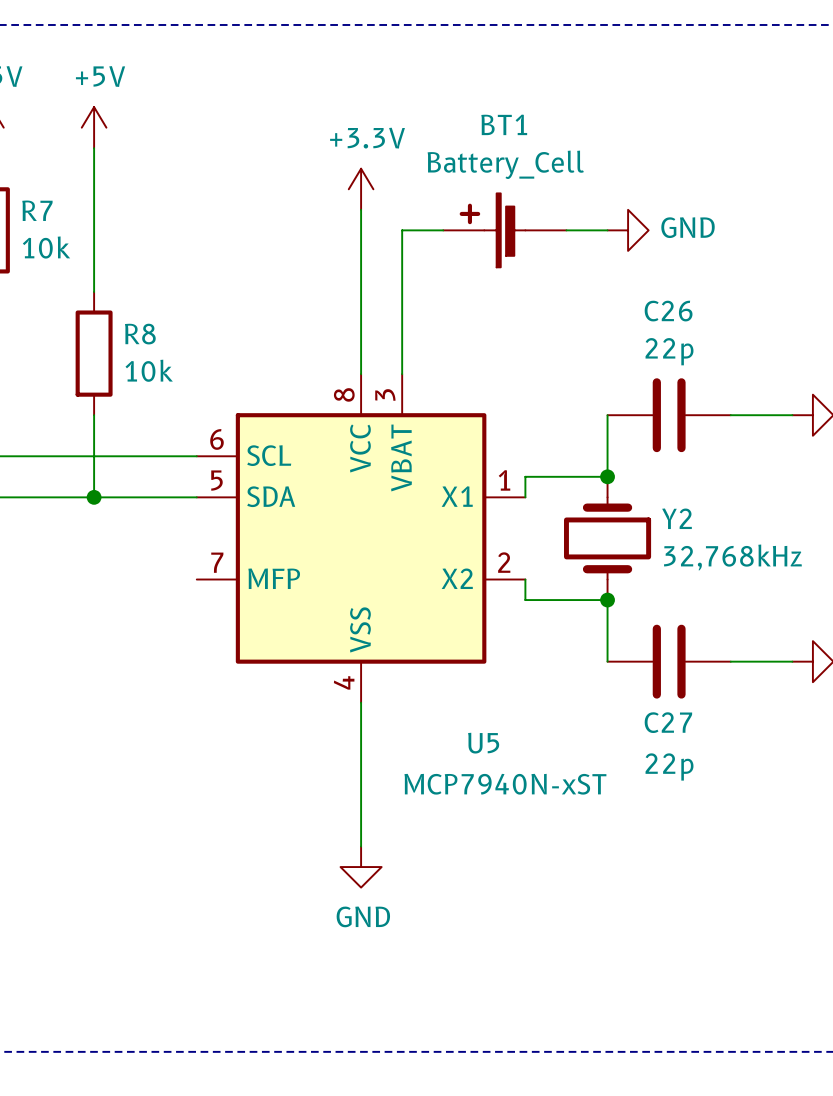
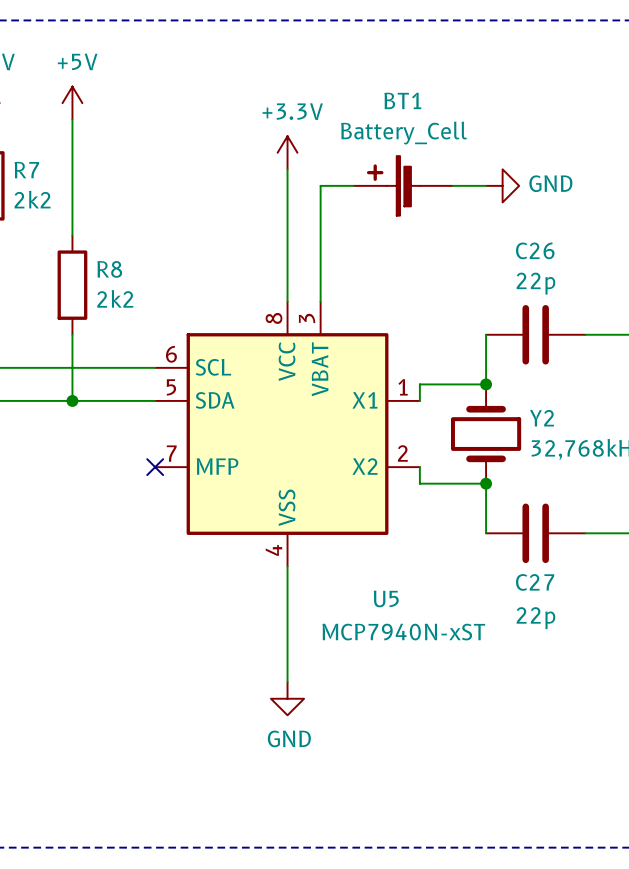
R7 value: 10k (46, 247) -> 2k2 (32, 199)
R8 value: 10k (149, 370) -> 2k2 (115, 298)
no-connect mark: none -> (155, 467)

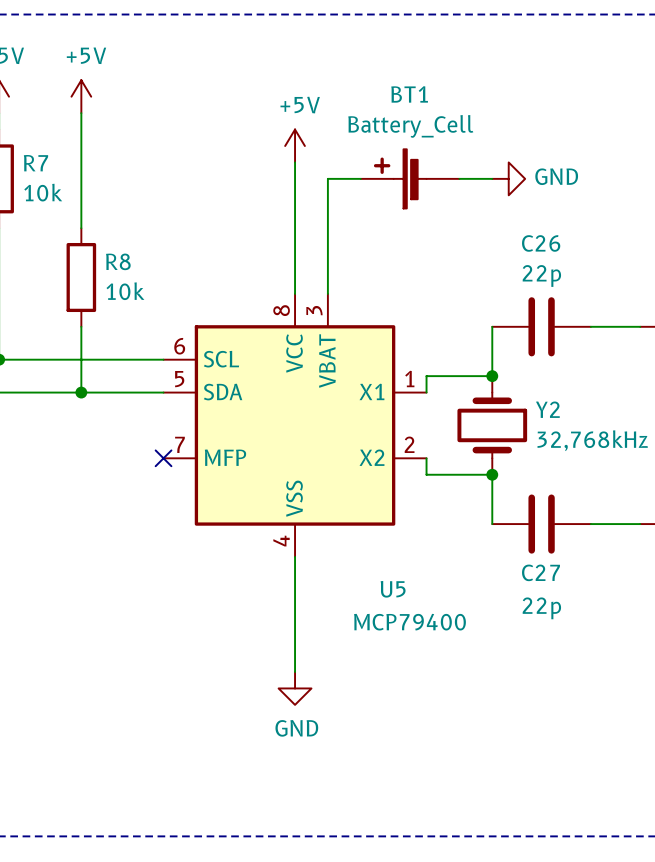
power symbol: +3.3V (287, 152) -> +5V (295, 146)
R7 value: 2k2 (32, 199) -> 10k (43, 192)
R8 value: 2k2 (115, 298) -> 10k (125, 291)
U5 value: MCP7940N-xST (403, 632) -> MCP79400 (410, 622)

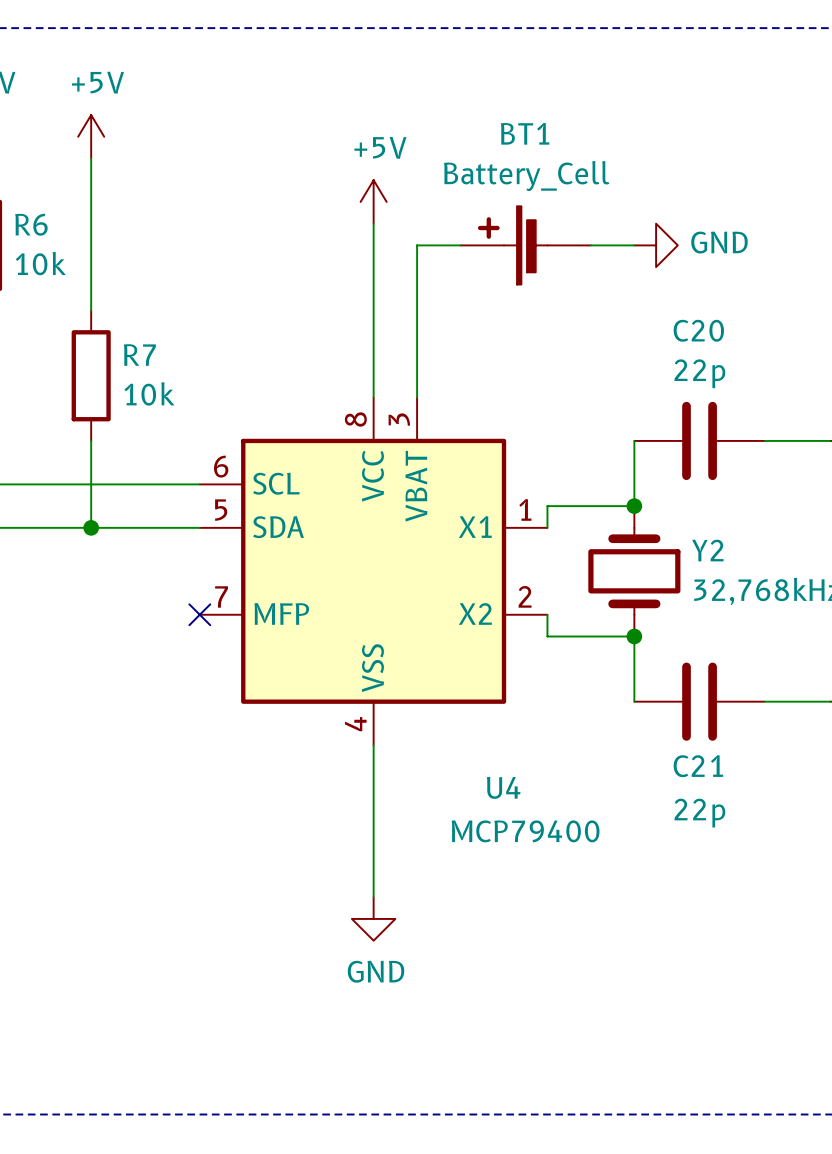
R7 name: R7 (35, 163) -> R6 (31, 224)
C26 name: C26 (541, 243) -> C20 (698, 330)
R8 name: R8 (118, 261) -> R7 (139, 355)
C27 name: C27 (540, 572) -> C21 (698, 766)
U5 name: U5 (393, 589) -> U4 (503, 787)

